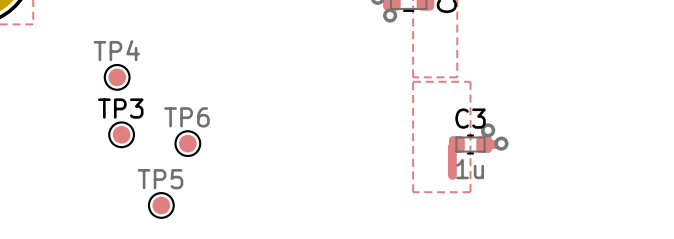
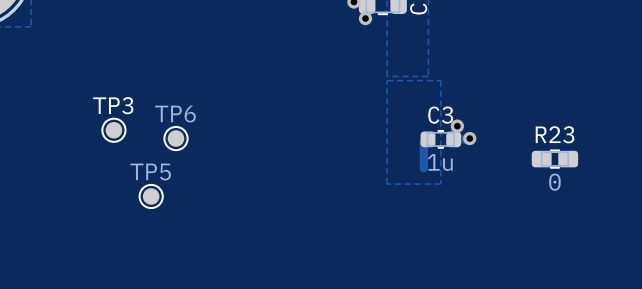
TP4: (117, 77) -> none
R23: none -> 0 (554, 159)

